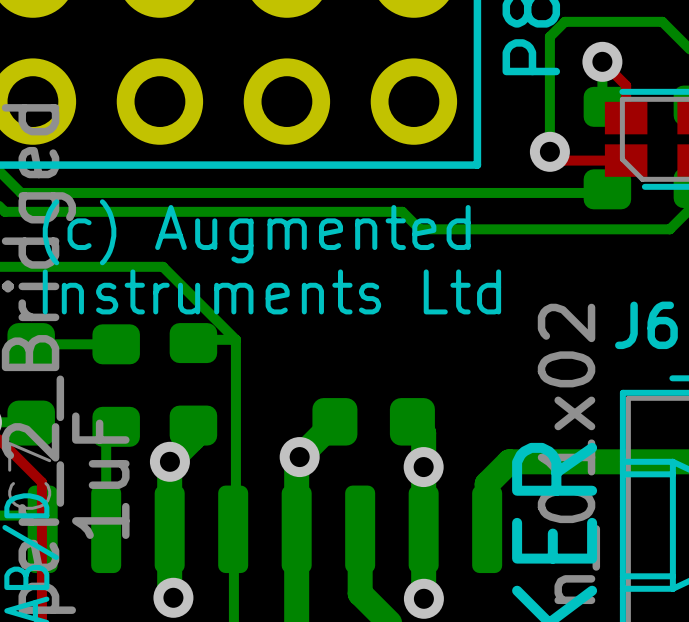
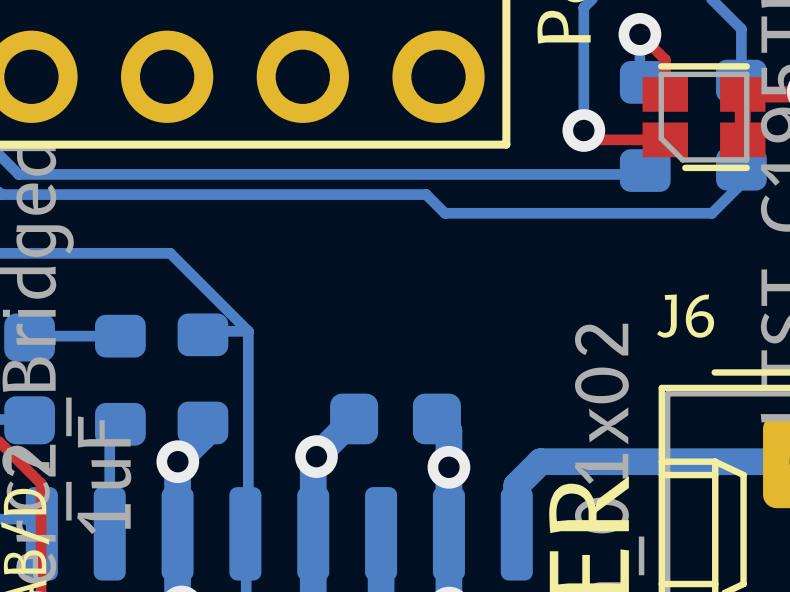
text: (c) Augmented (256, 232) -> none
text: Instruments Ltd (271, 291) -> none

